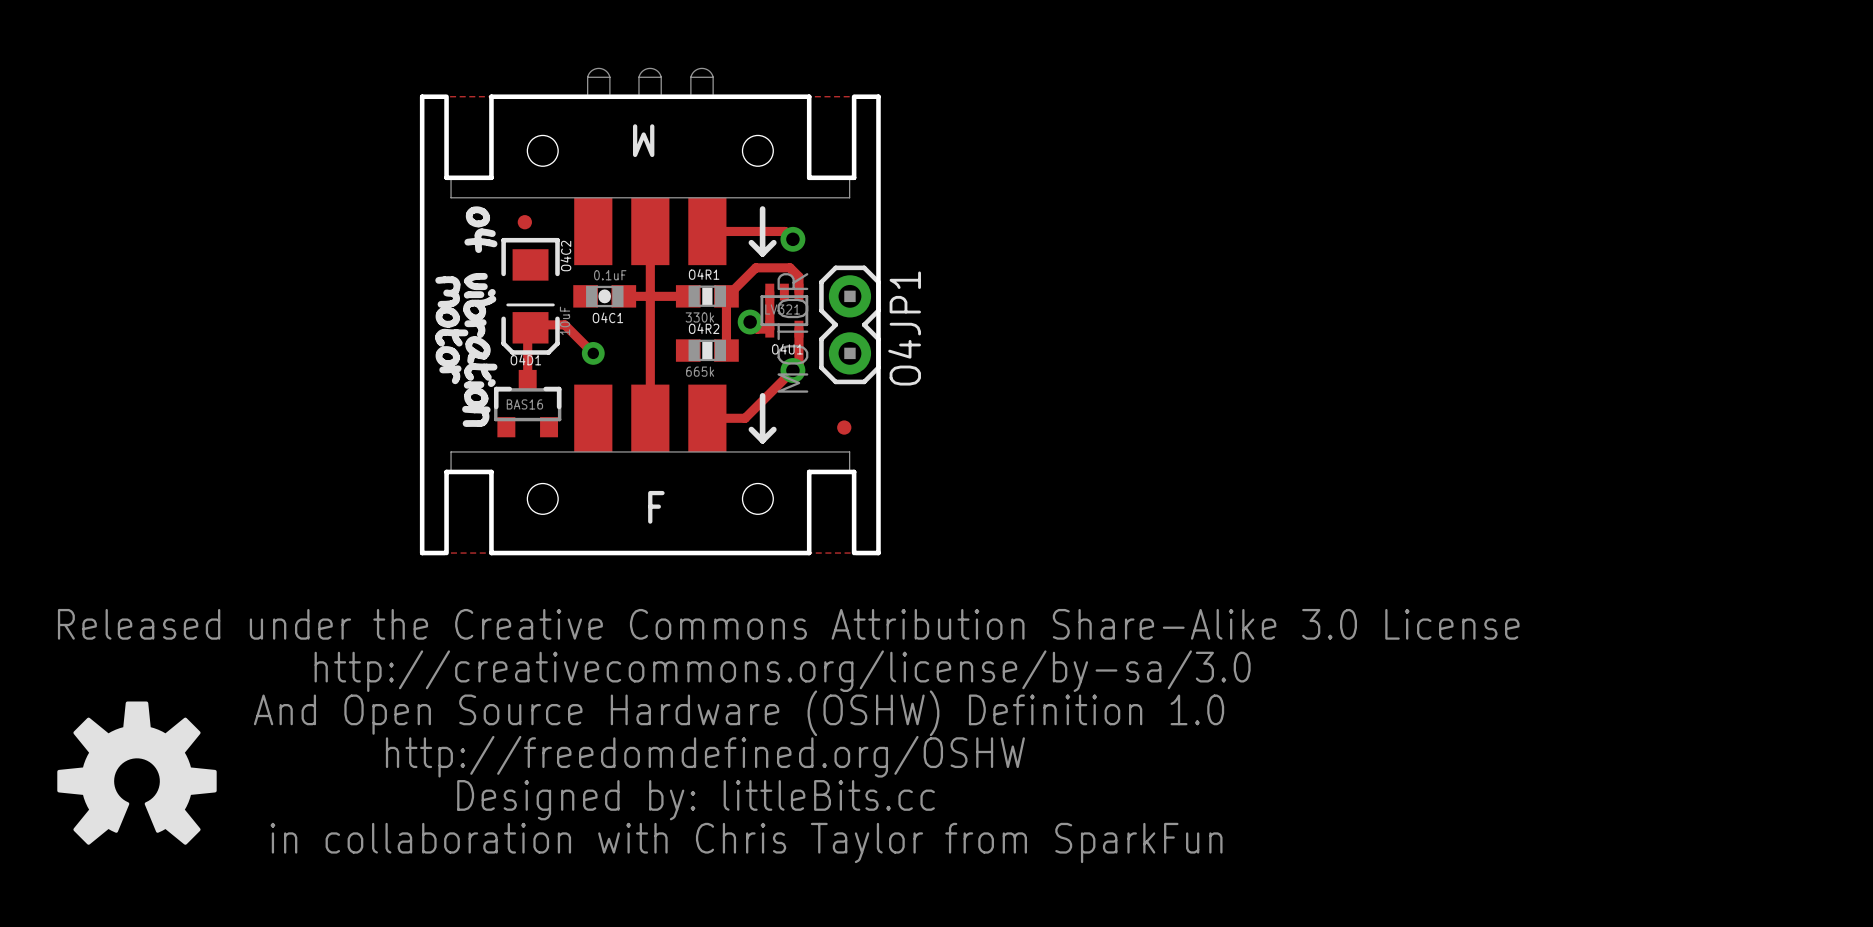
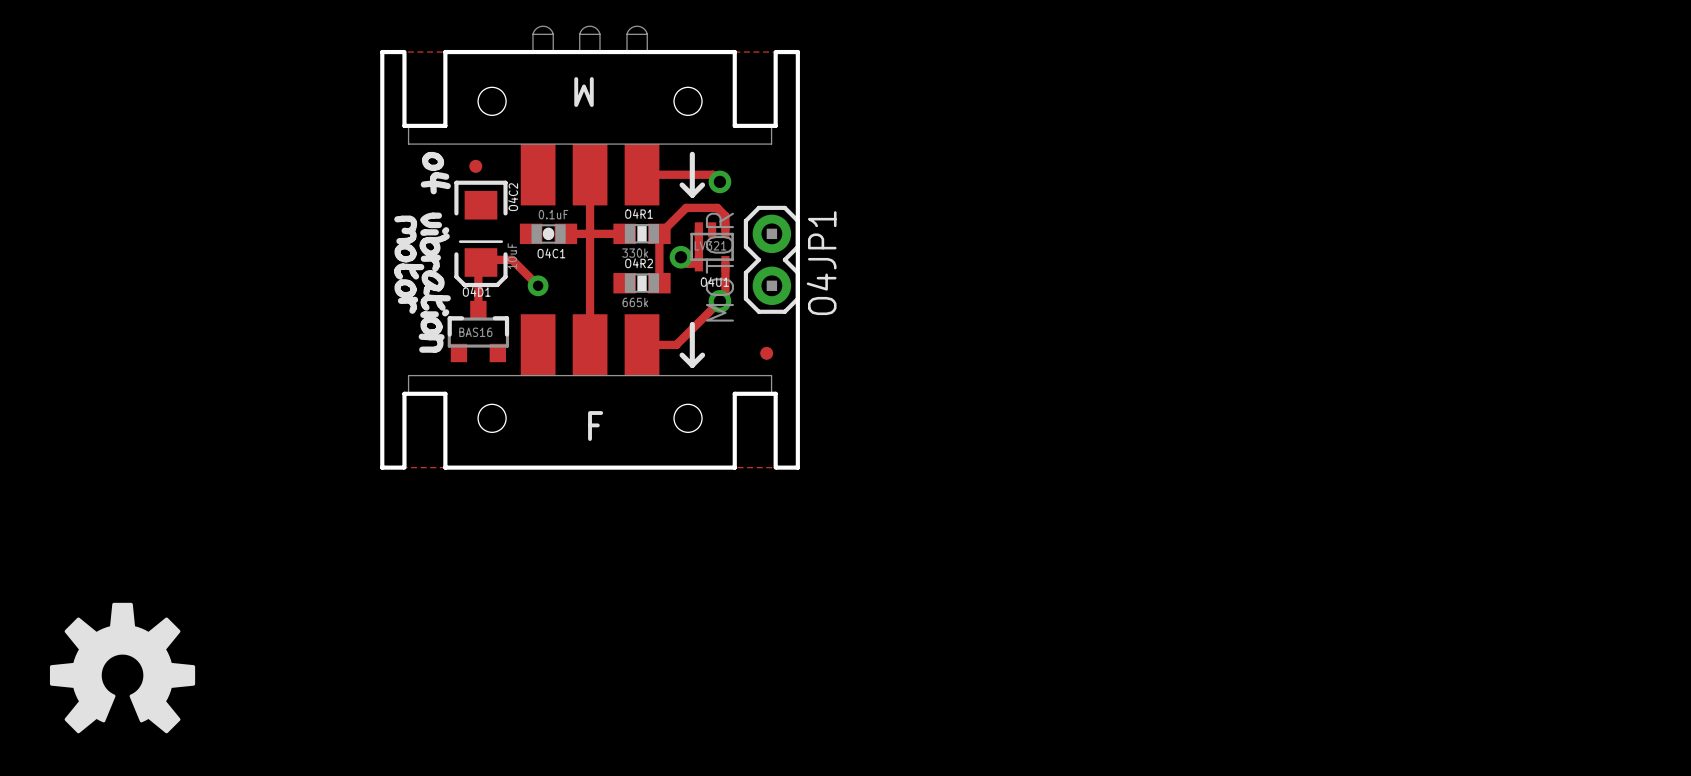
drawing: [57, 608, 1520, 864] -> none

